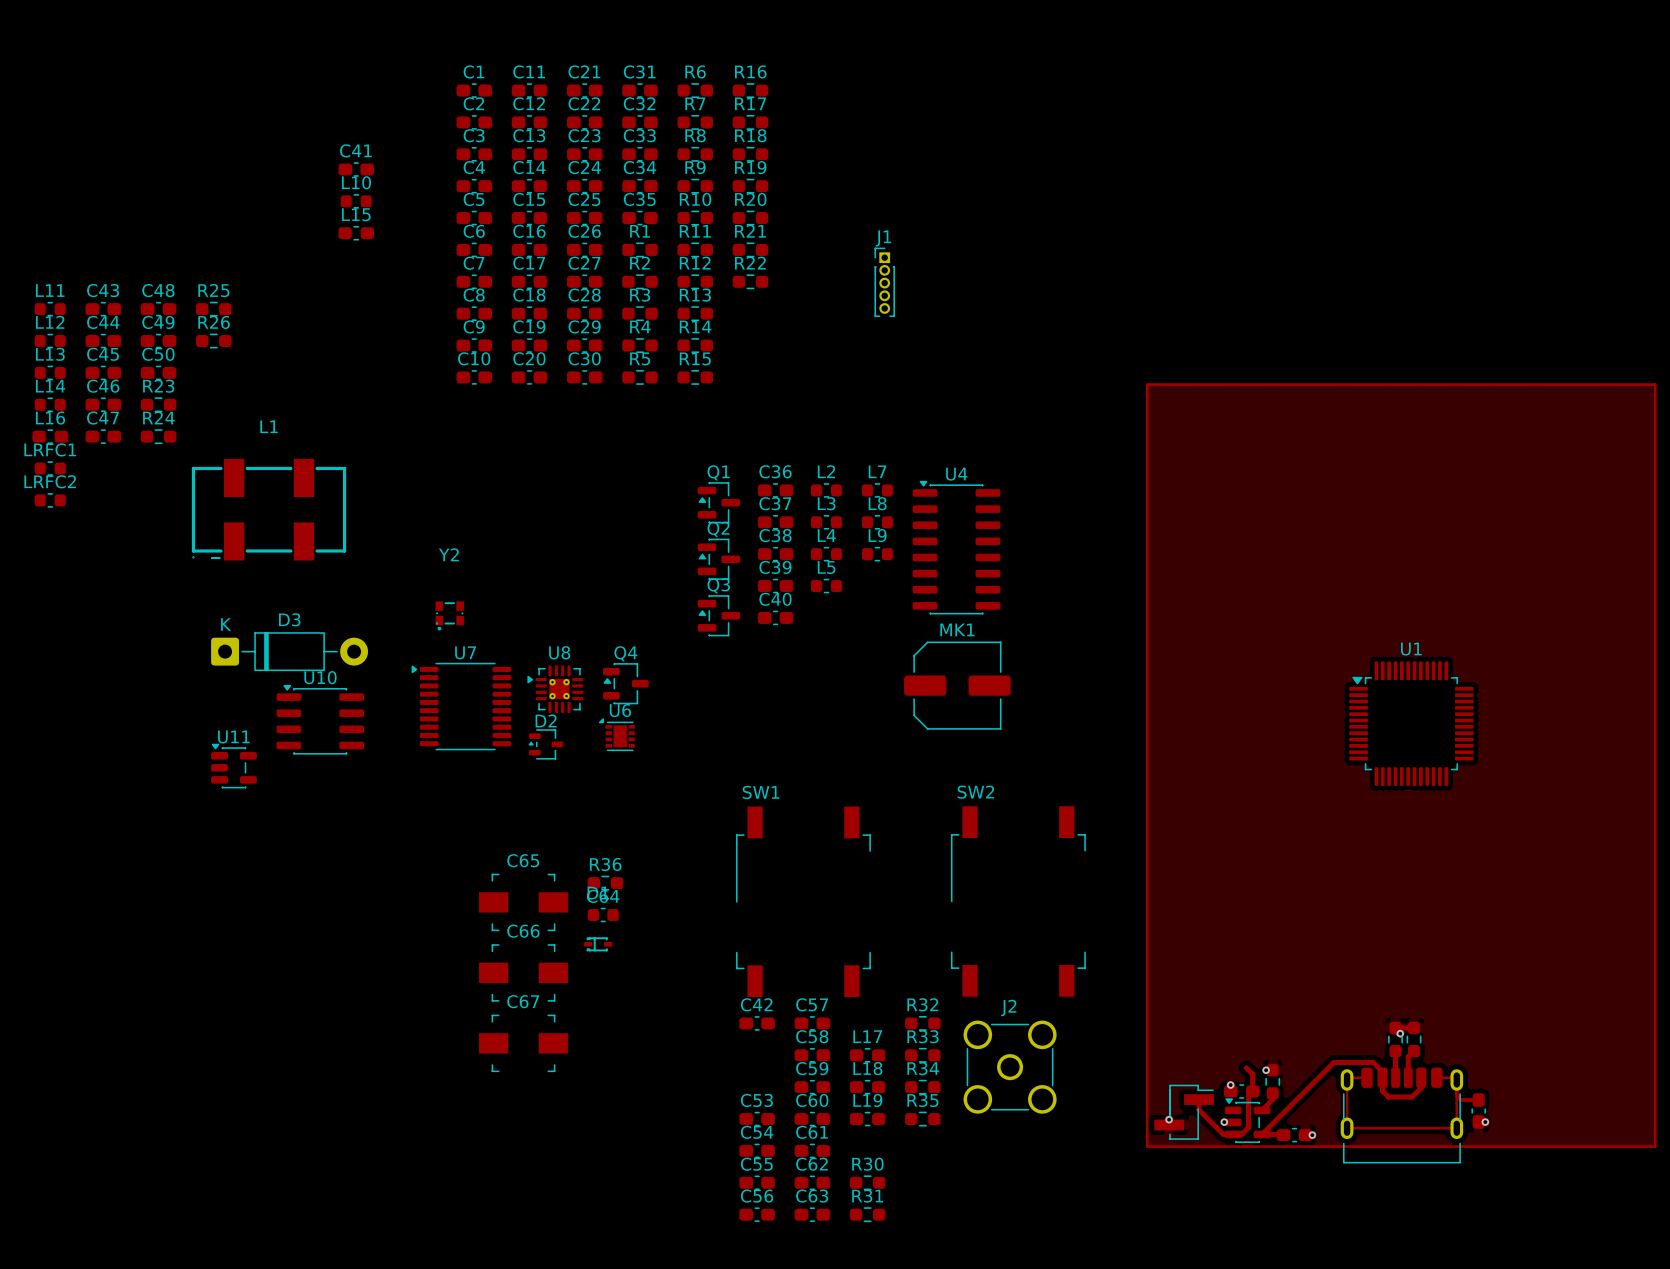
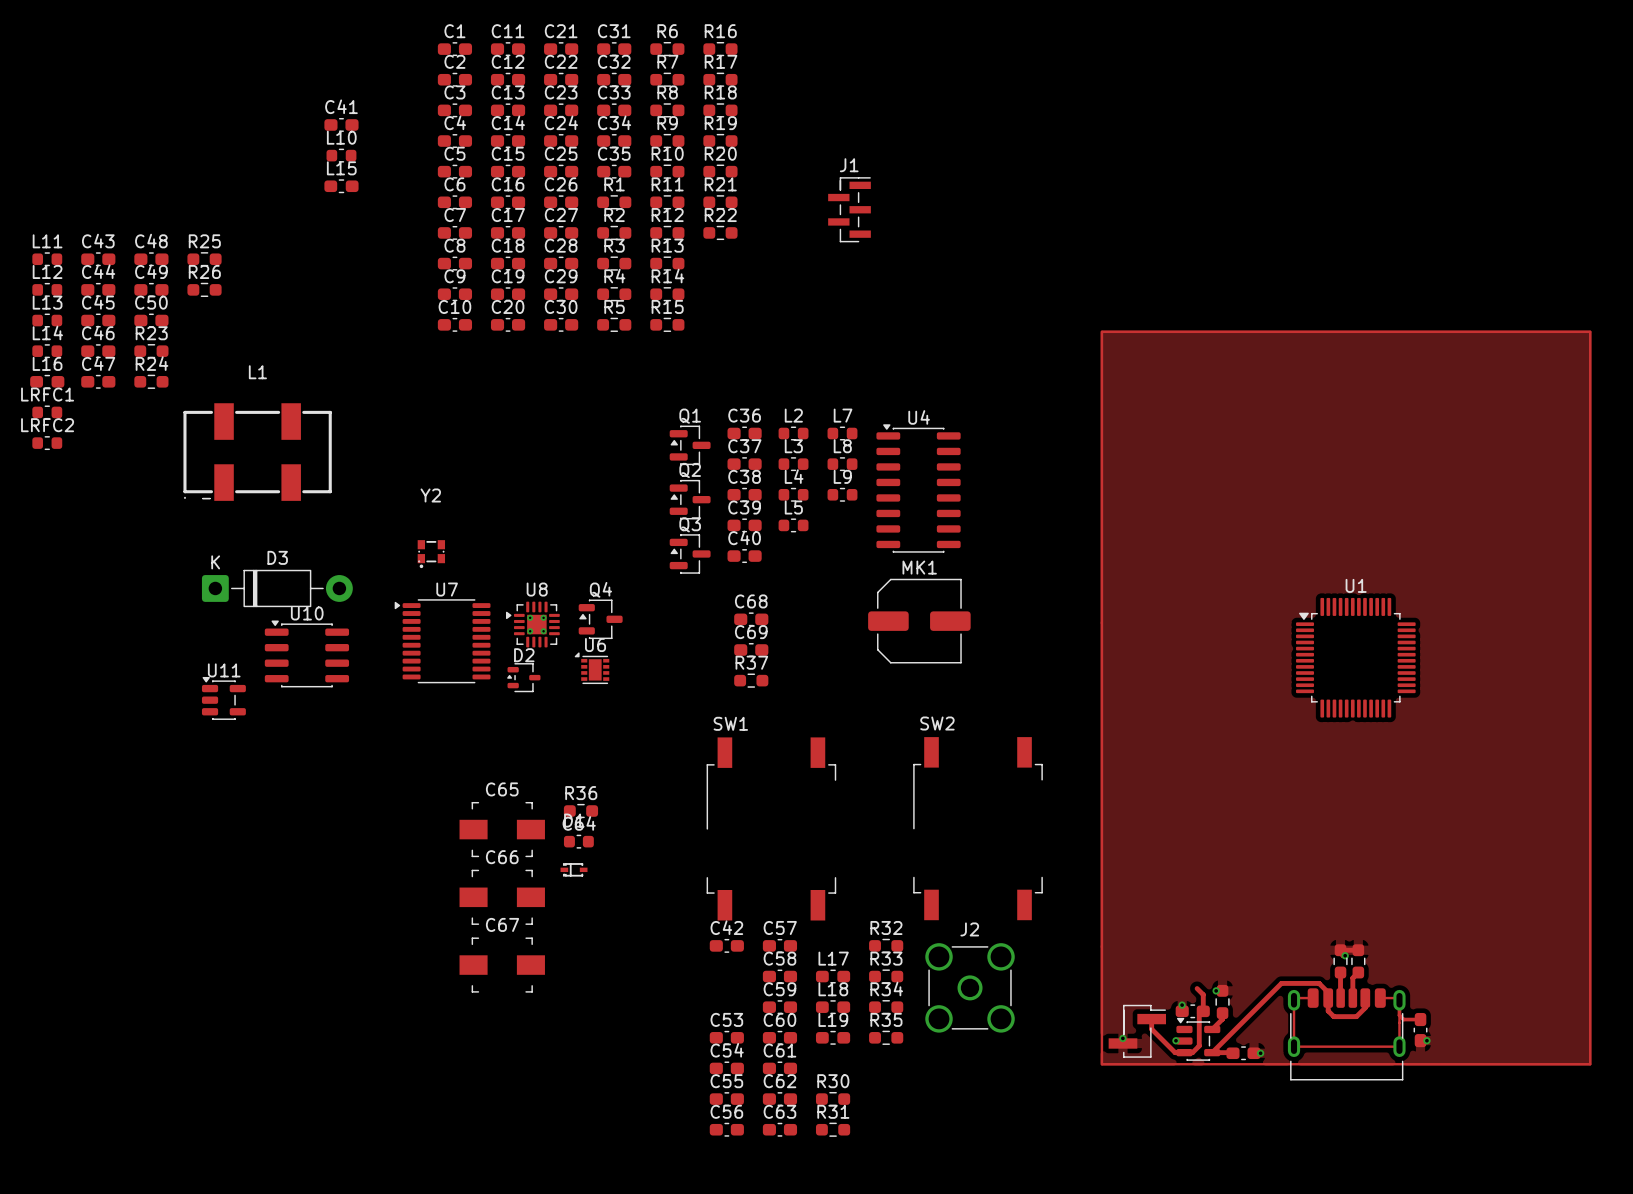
J1 footprint: [874, 247, 895, 317] -> [828, 177, 871, 243]
C68: none -> (751, 619)
C69: none -> (751, 649)
R37: none -> (751, 680)

